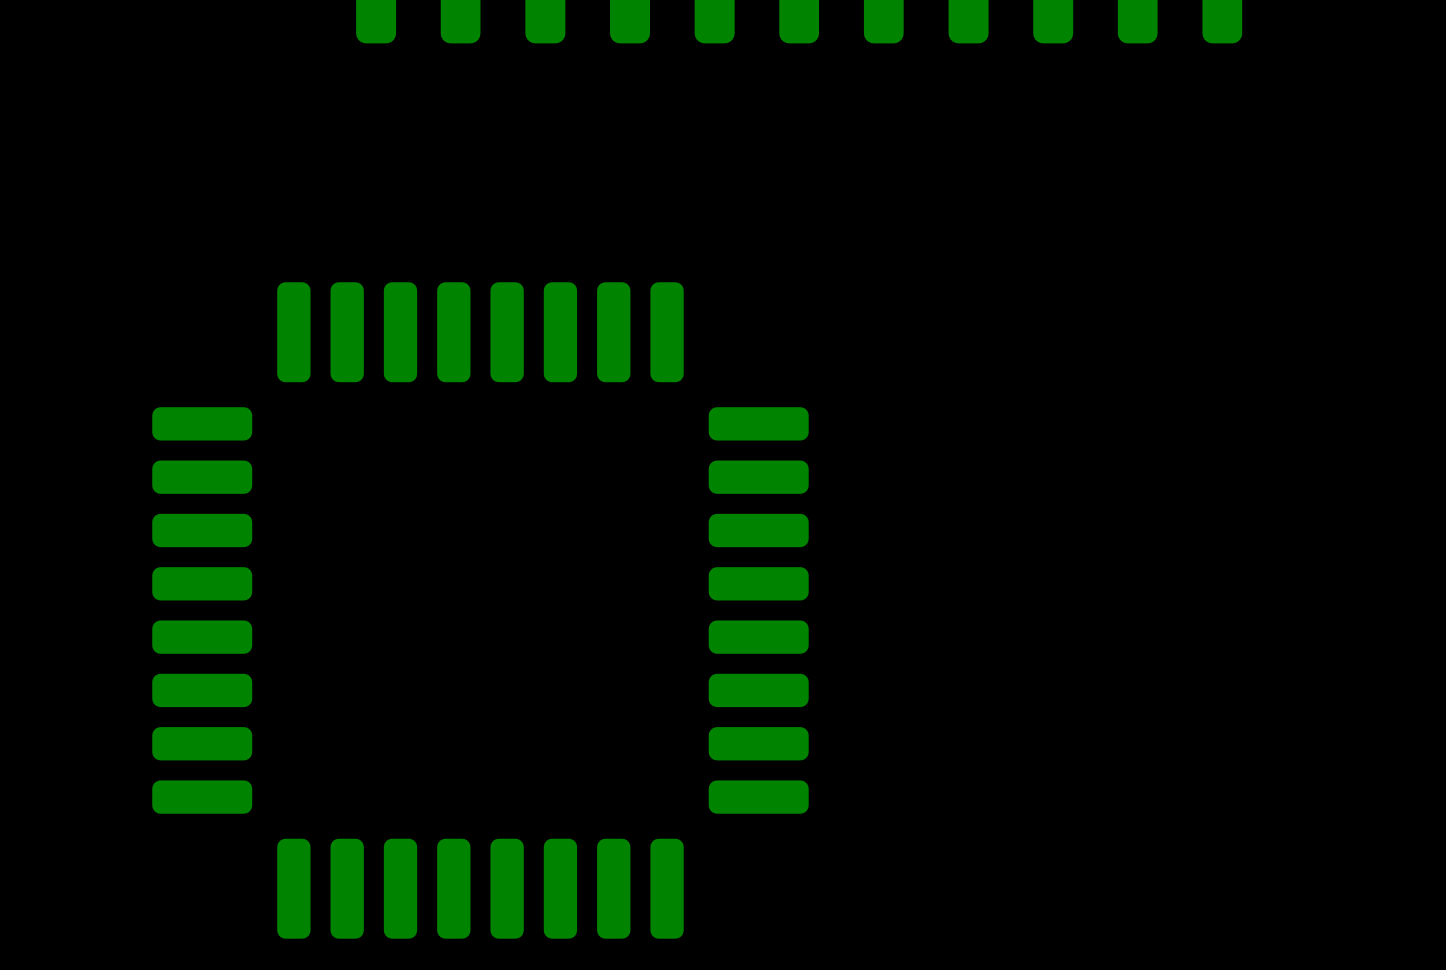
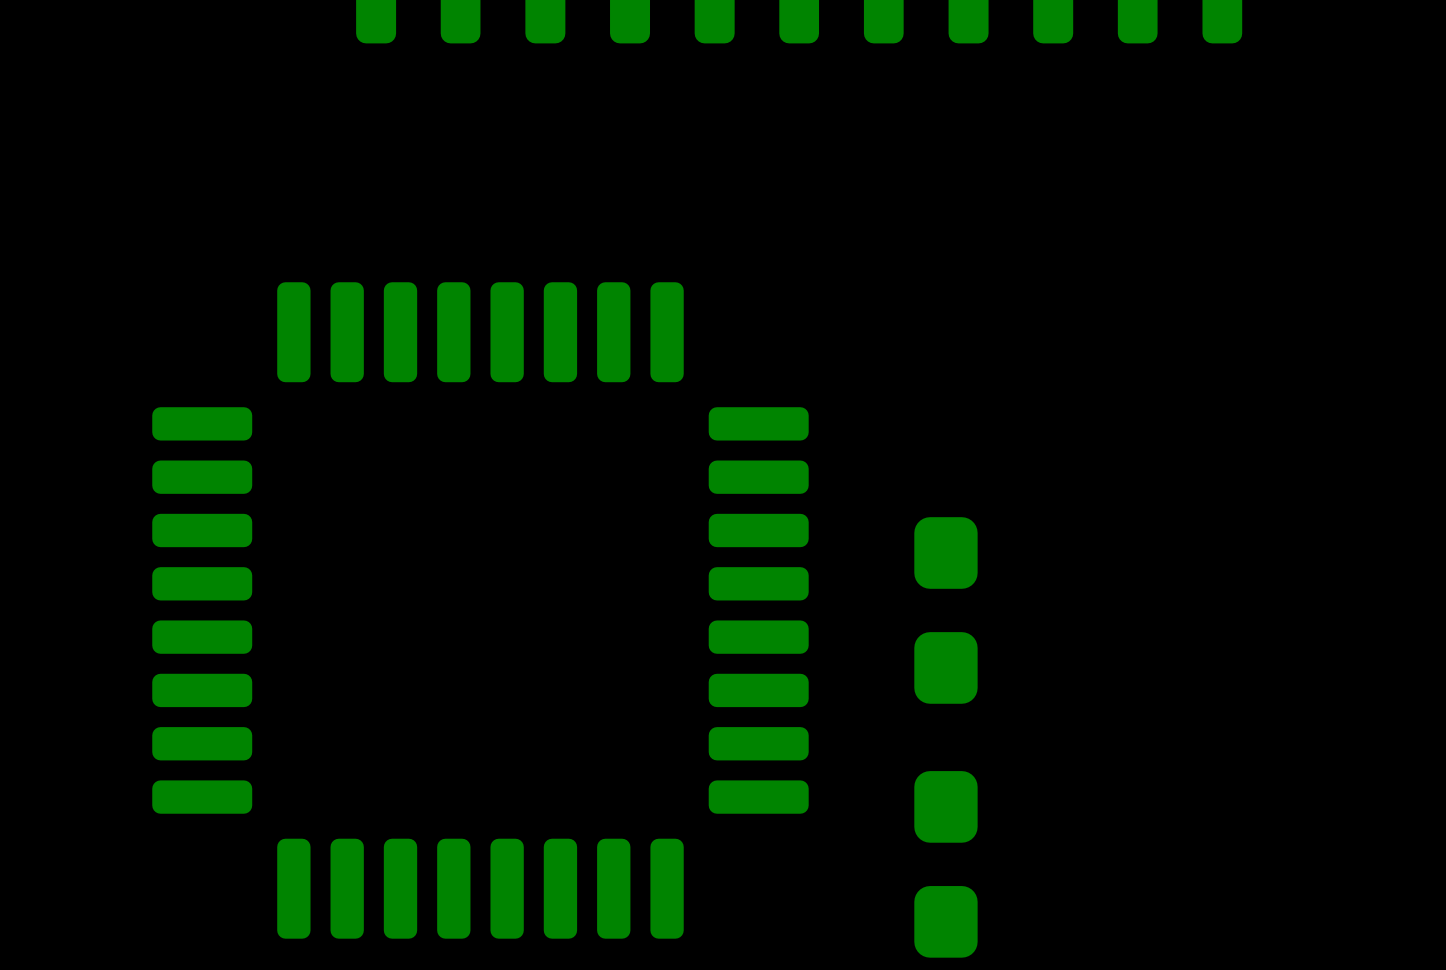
part: none -> (945, 610)
part: none -> (945, 864)

